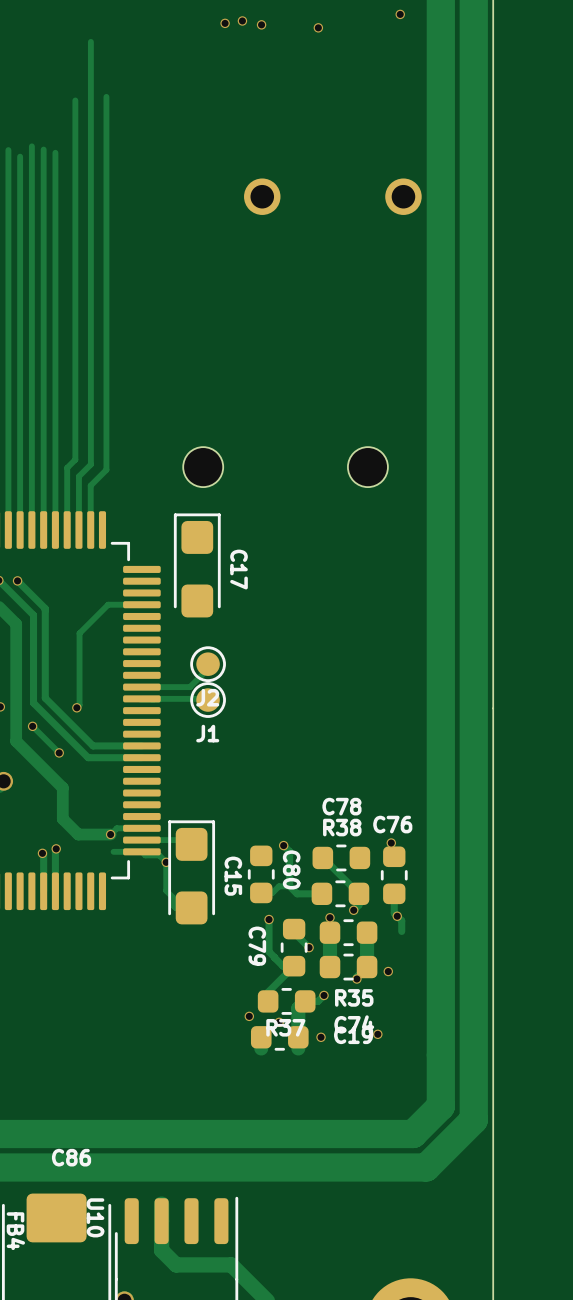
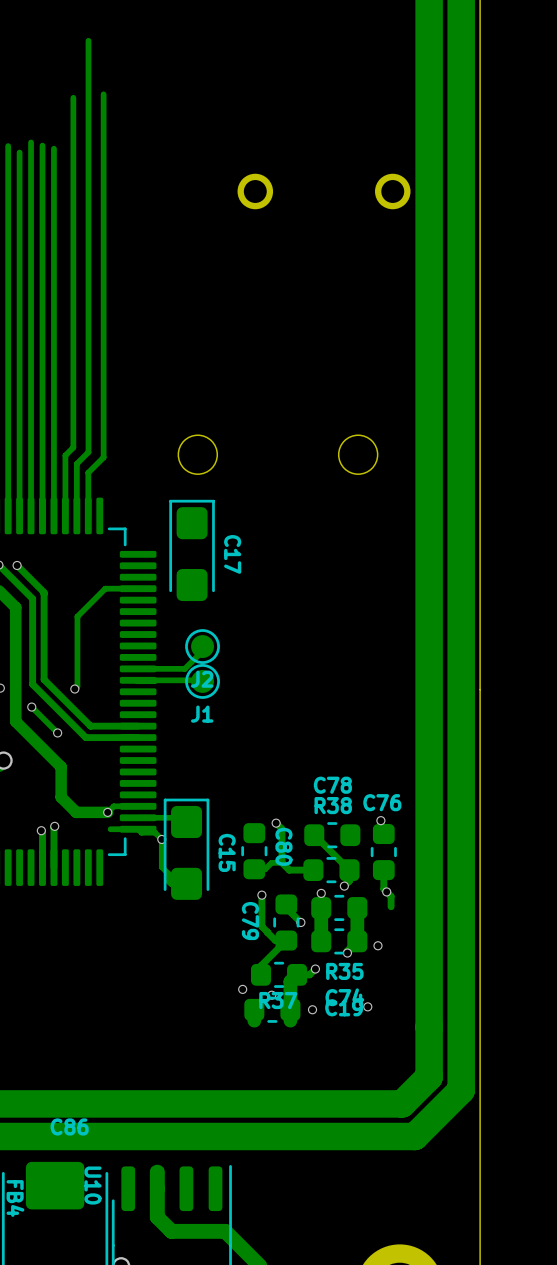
via: (400, 14) -> none
via: (242, 20) -> none
via: (225, 23) -> none
via: (261, 24) -> none
via: (318, 27) -> none

